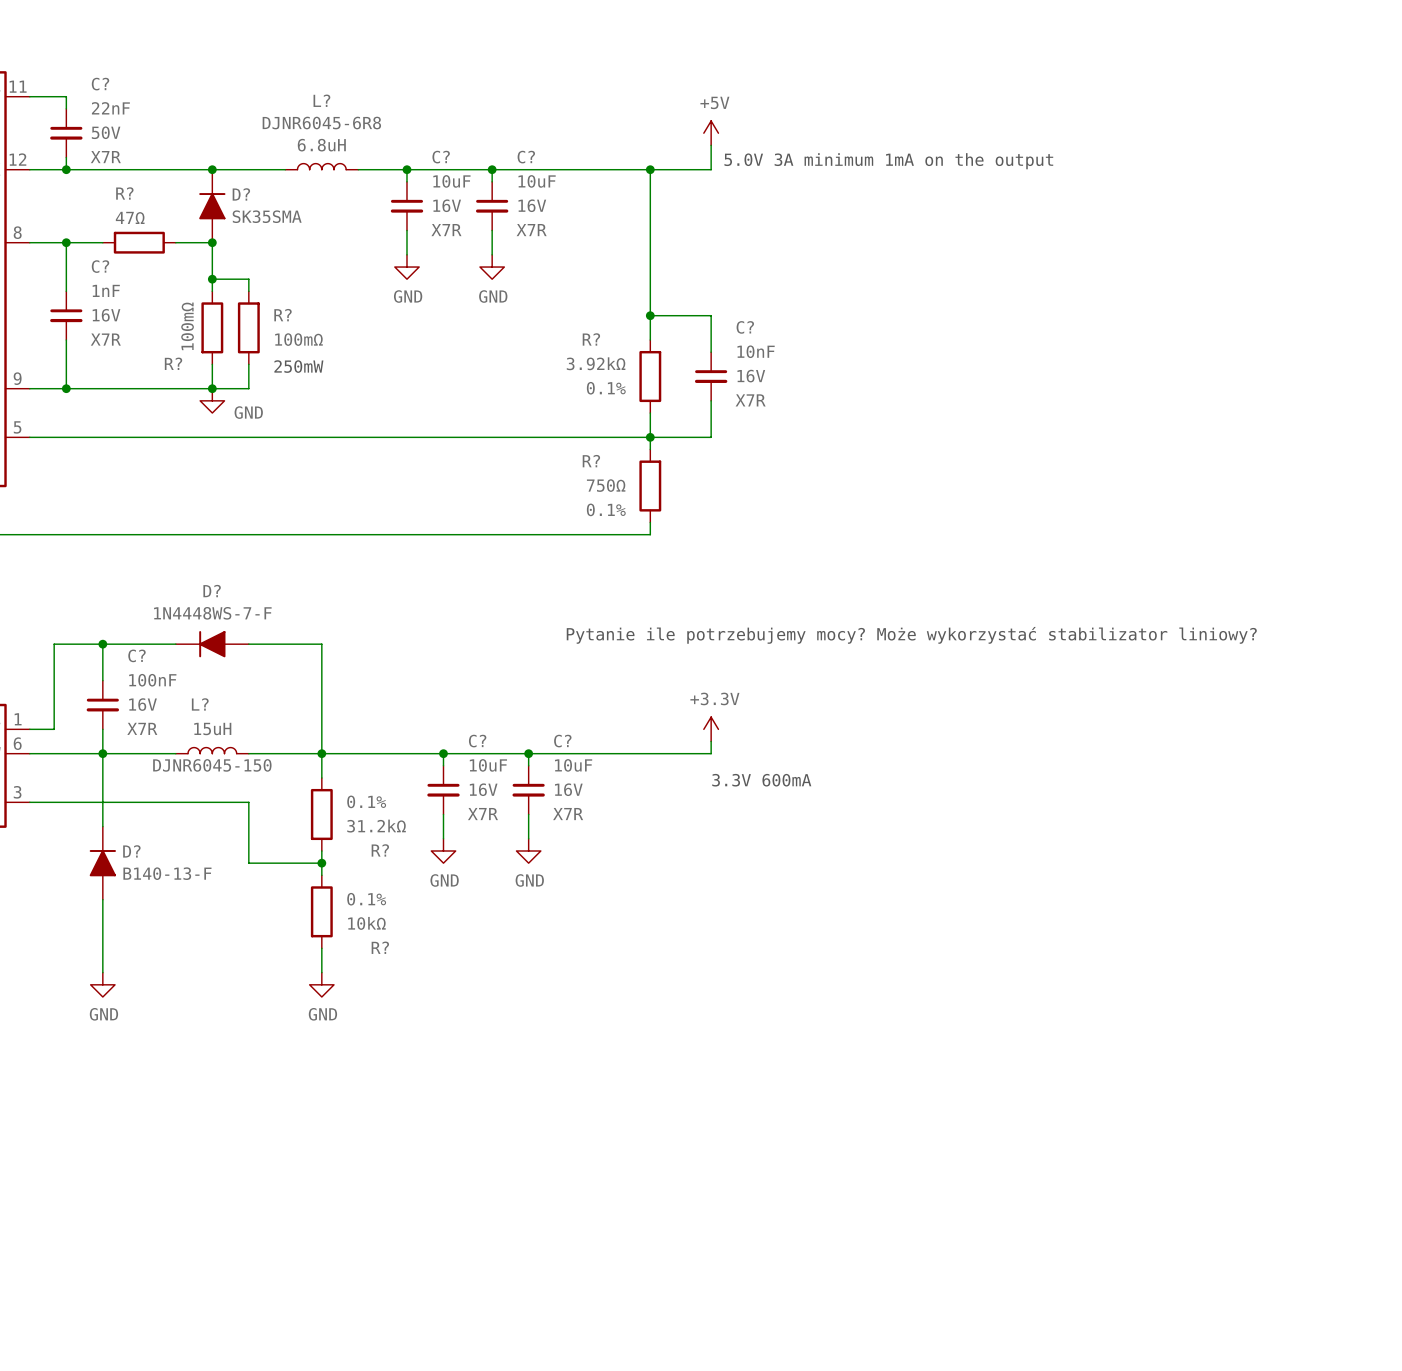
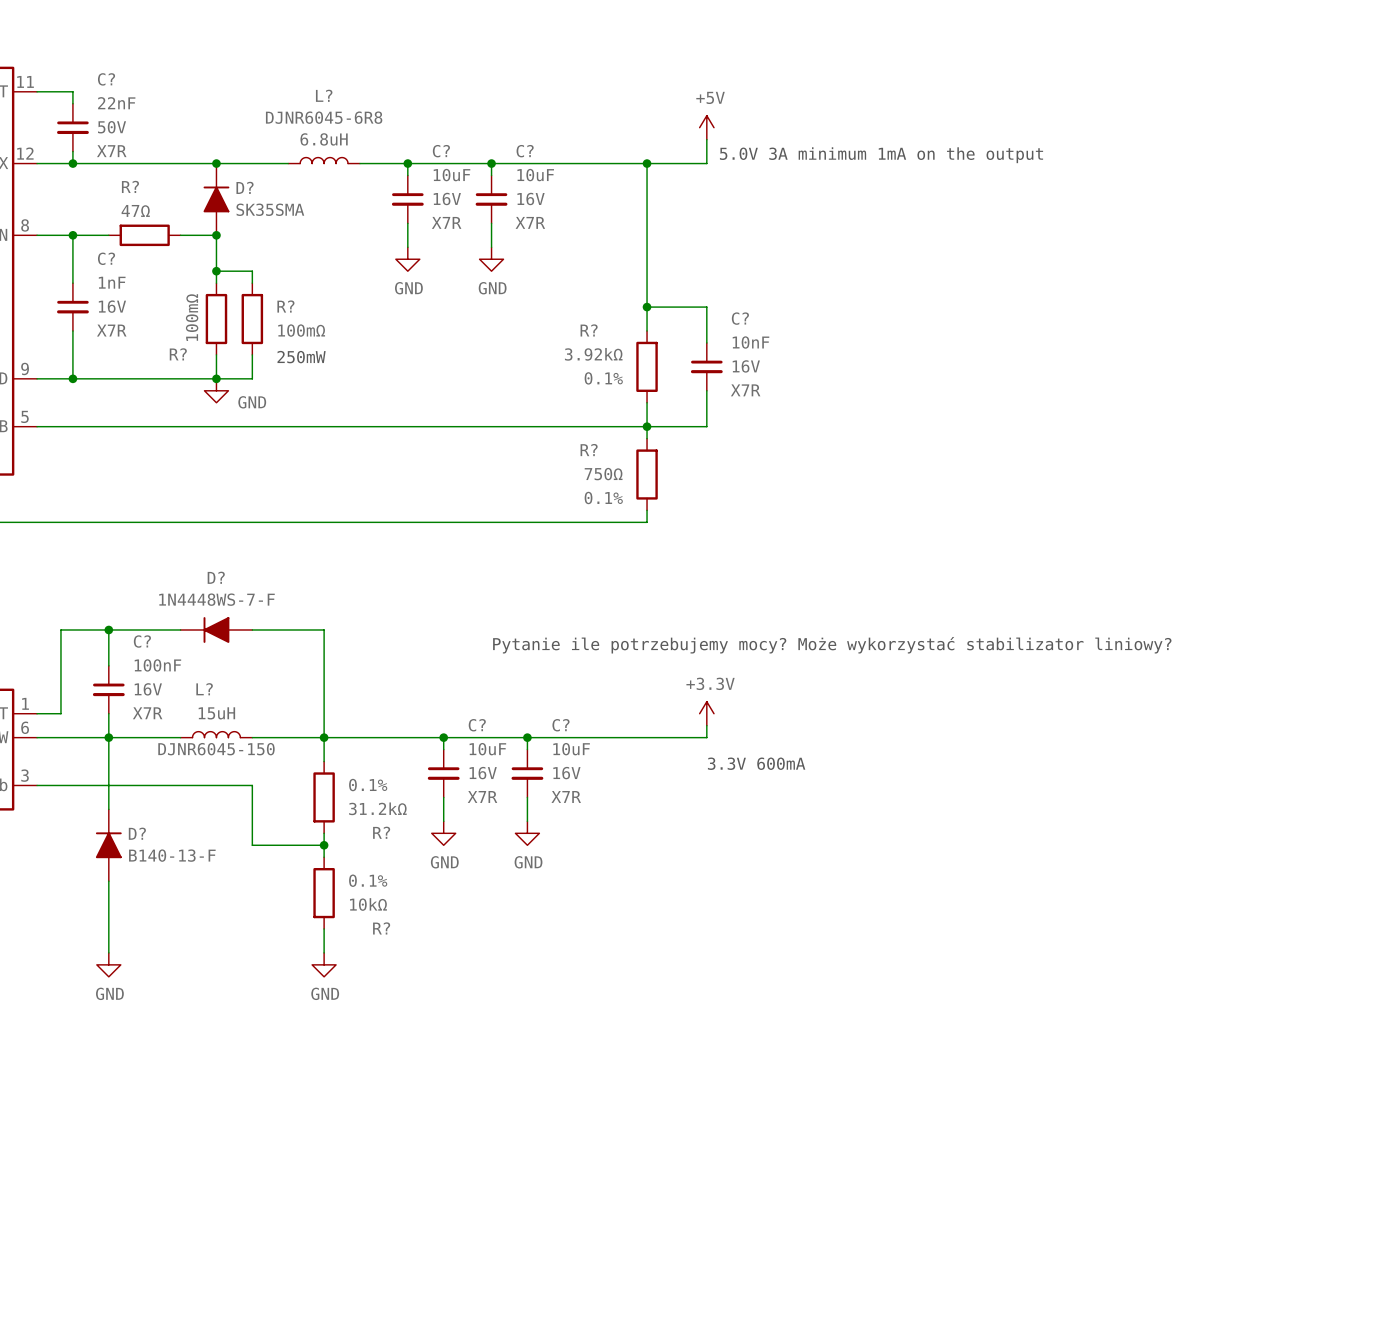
text position: Pytanie ile potrzebujemy mocy? Może wykorzystać stabilizator liniowy? (911, 635) -> Pytanie ile potrzebujemy mocy? Może wykorzystać stabilizator liniowy? (832, 645)

